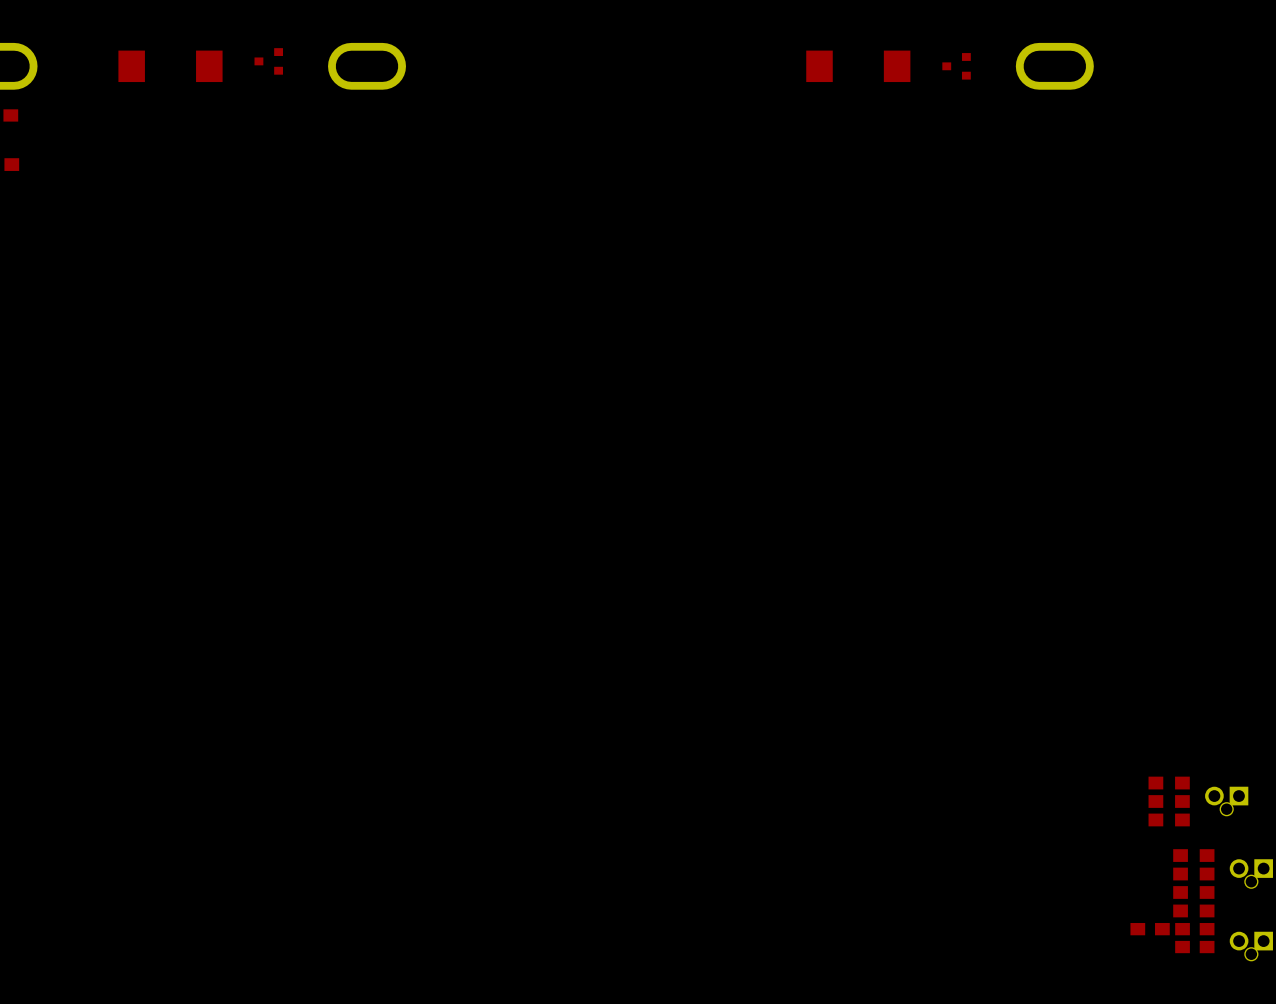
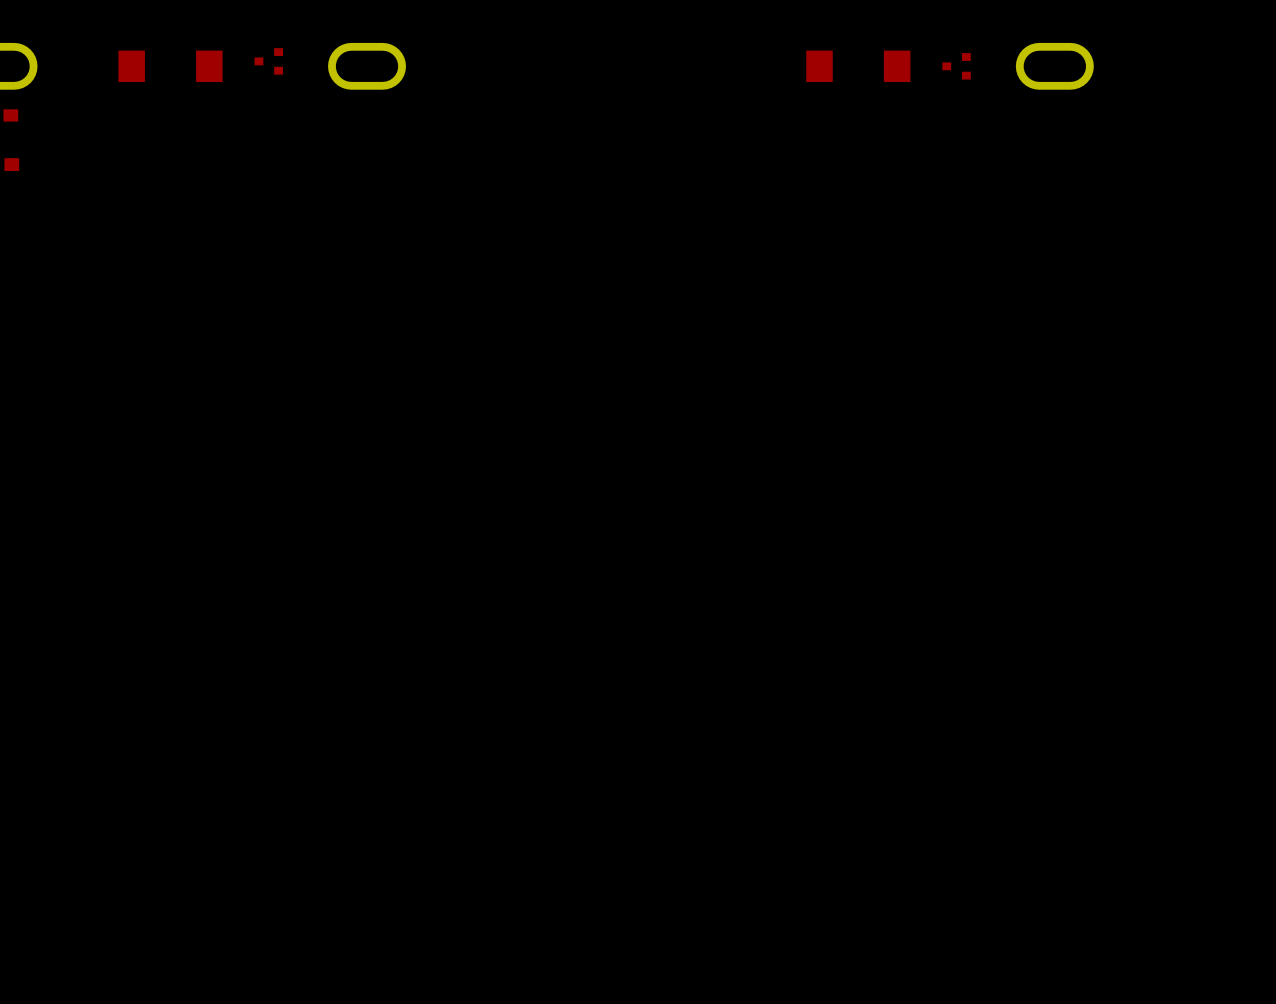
part: (1169, 783) -> none
part: (1169, 801) -> none
part: (1226, 801) -> none
part: (1169, 819) -> none
part: (1193, 855) -> none
part: (1251, 873) -> none
part: (1193, 874) -> none
part: (1193, 892) -> none
part: (1193, 910) -> none
part: (1150, 929) -> none
part: (1194, 929) -> none
part: (1251, 946) -> none
part: (1194, 947) -> none

